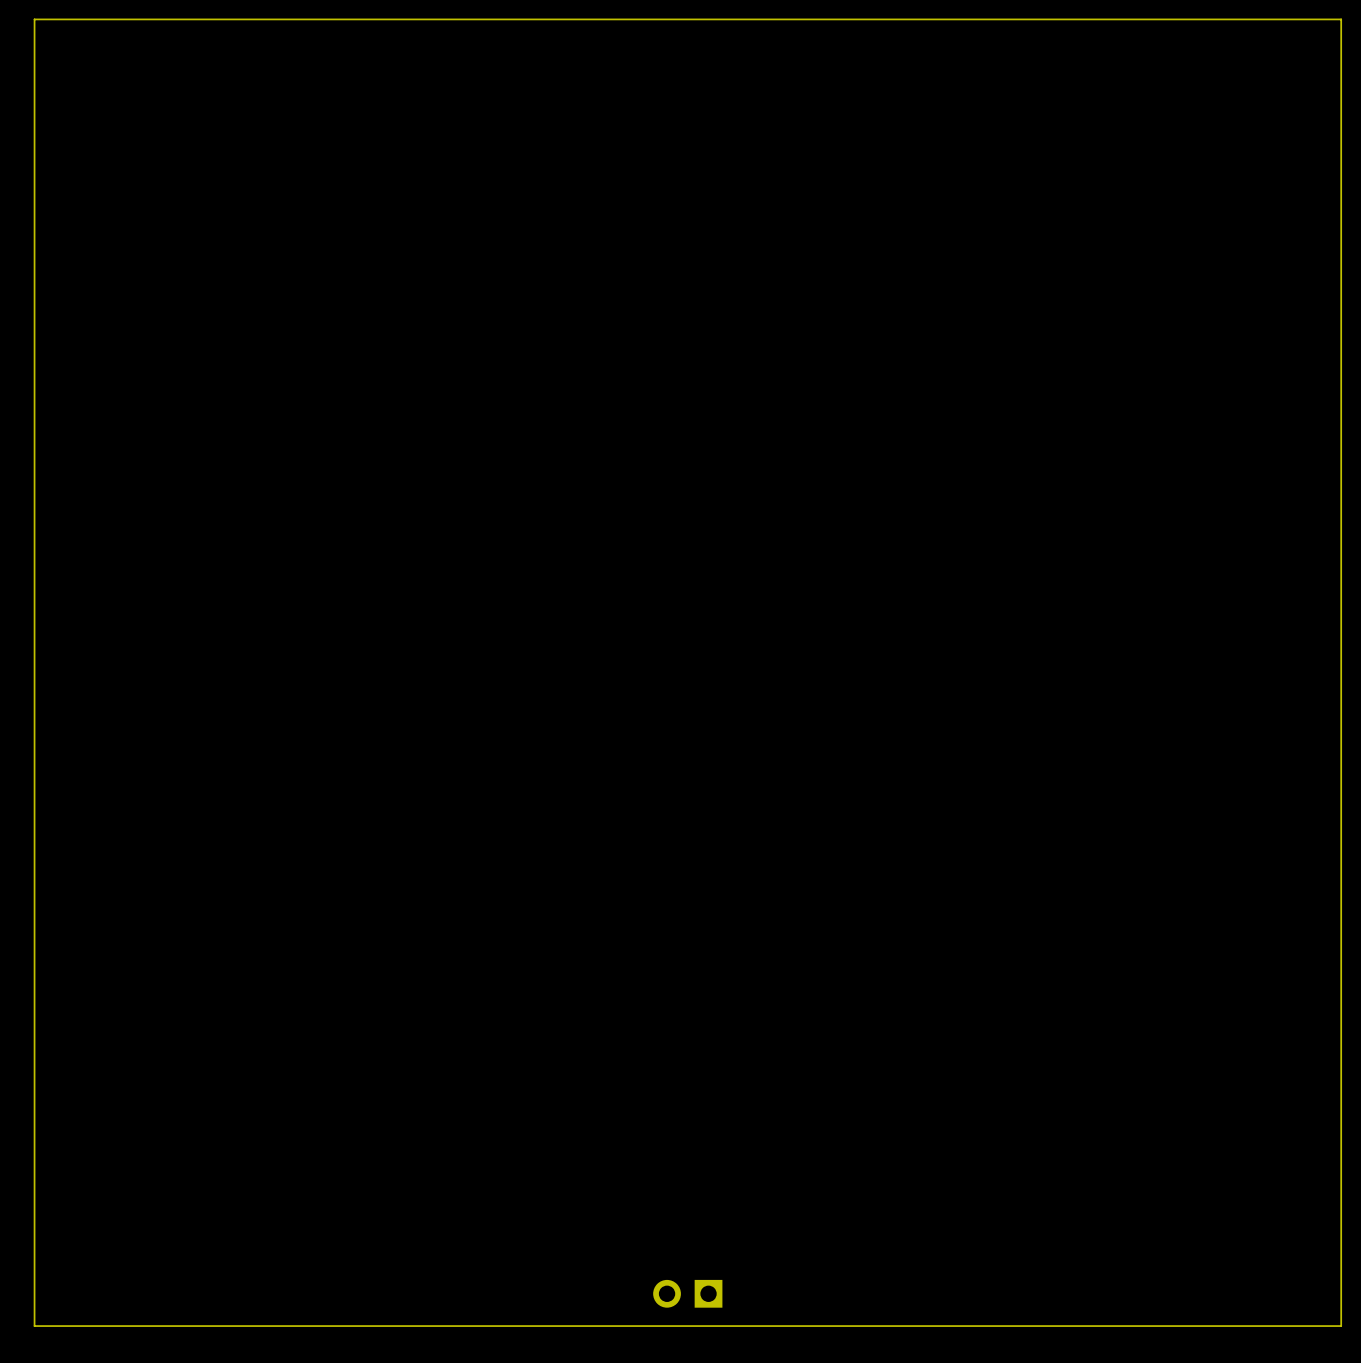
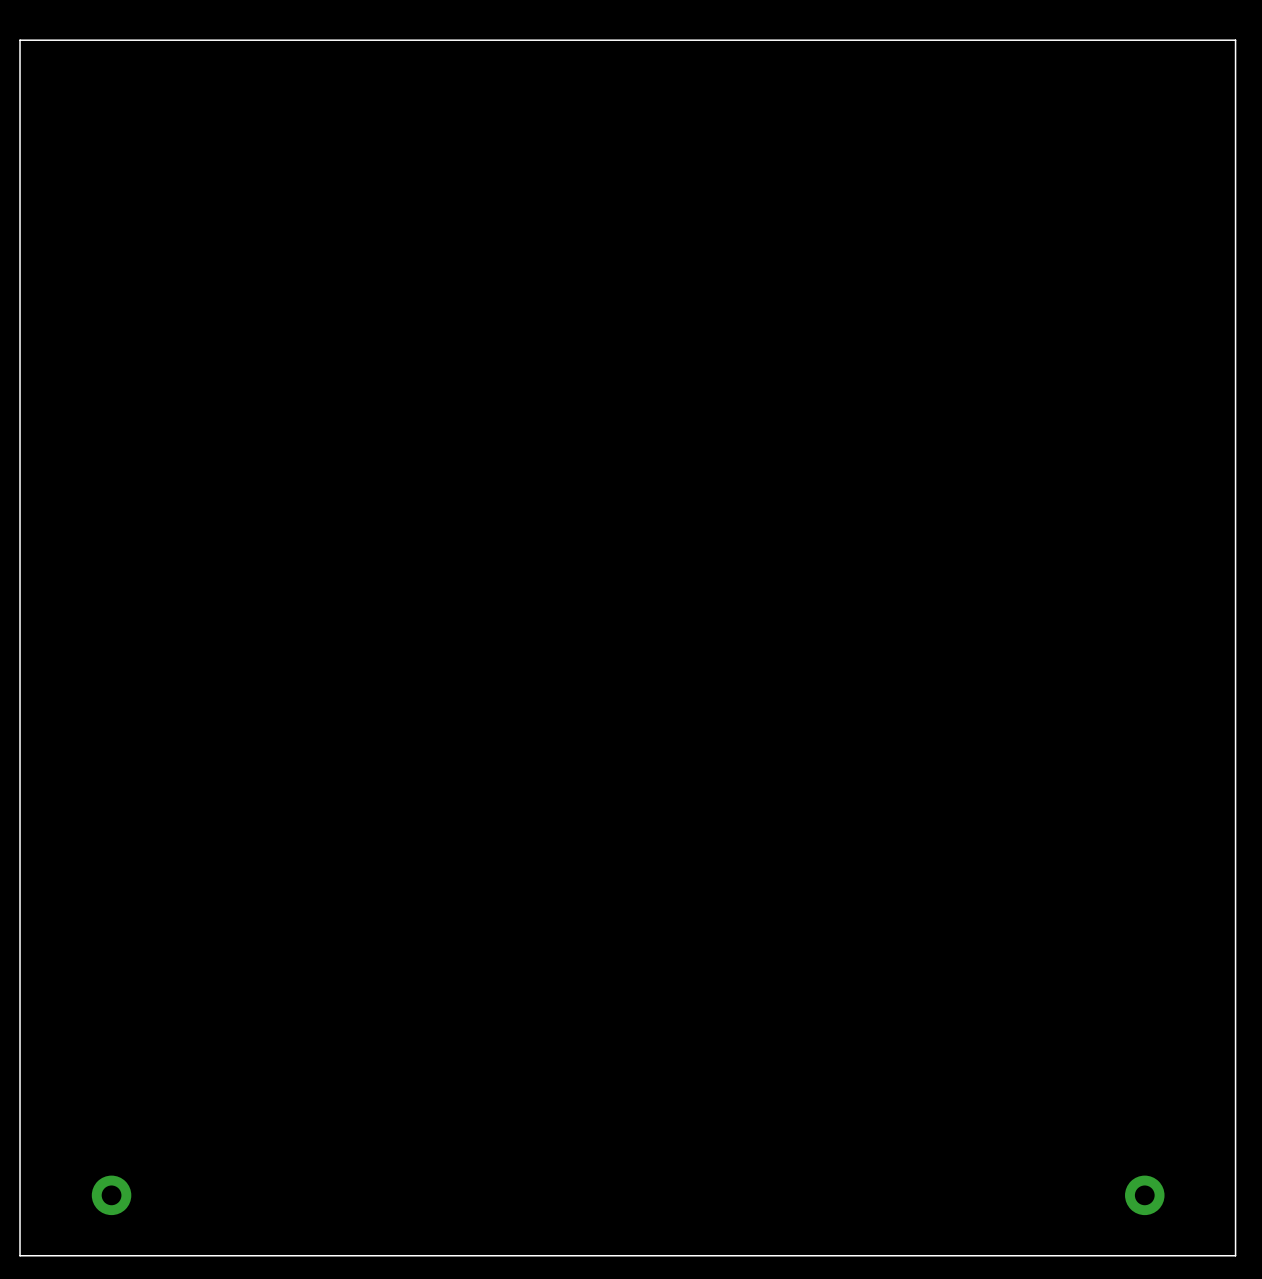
part: none -> (111, 1195)
part: none -> (1144, 1195)
part: (687, 1293) -> none

